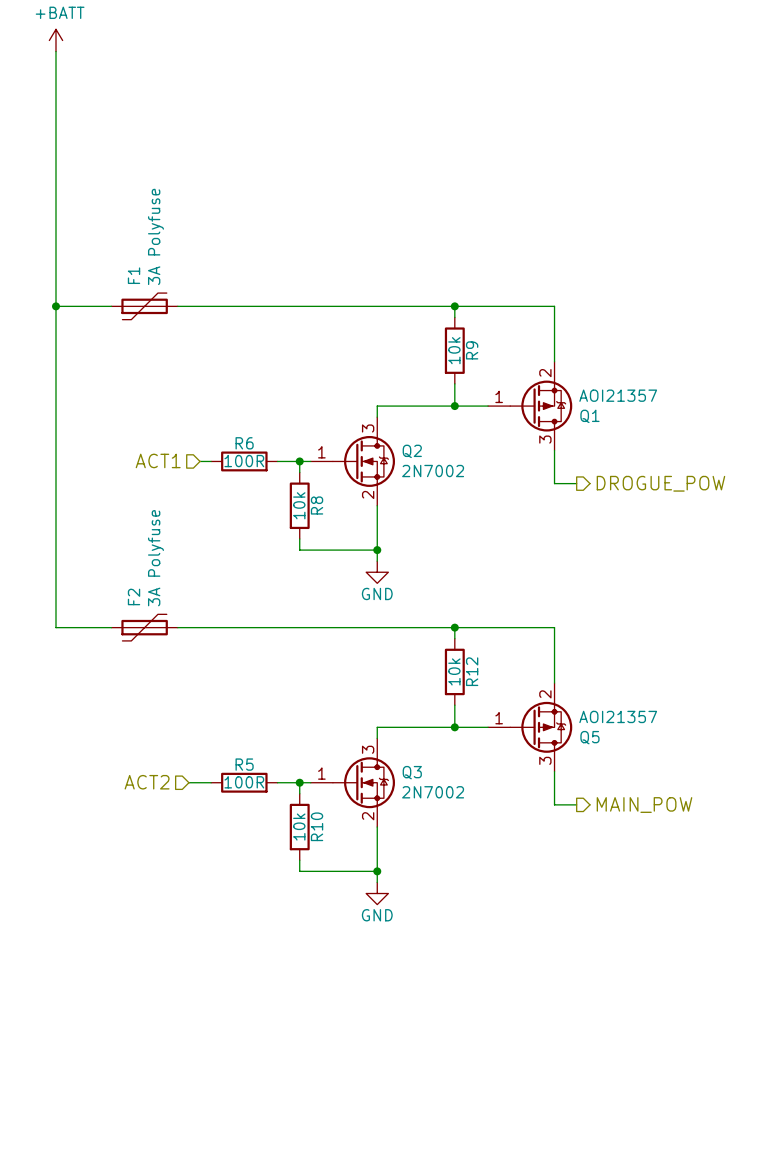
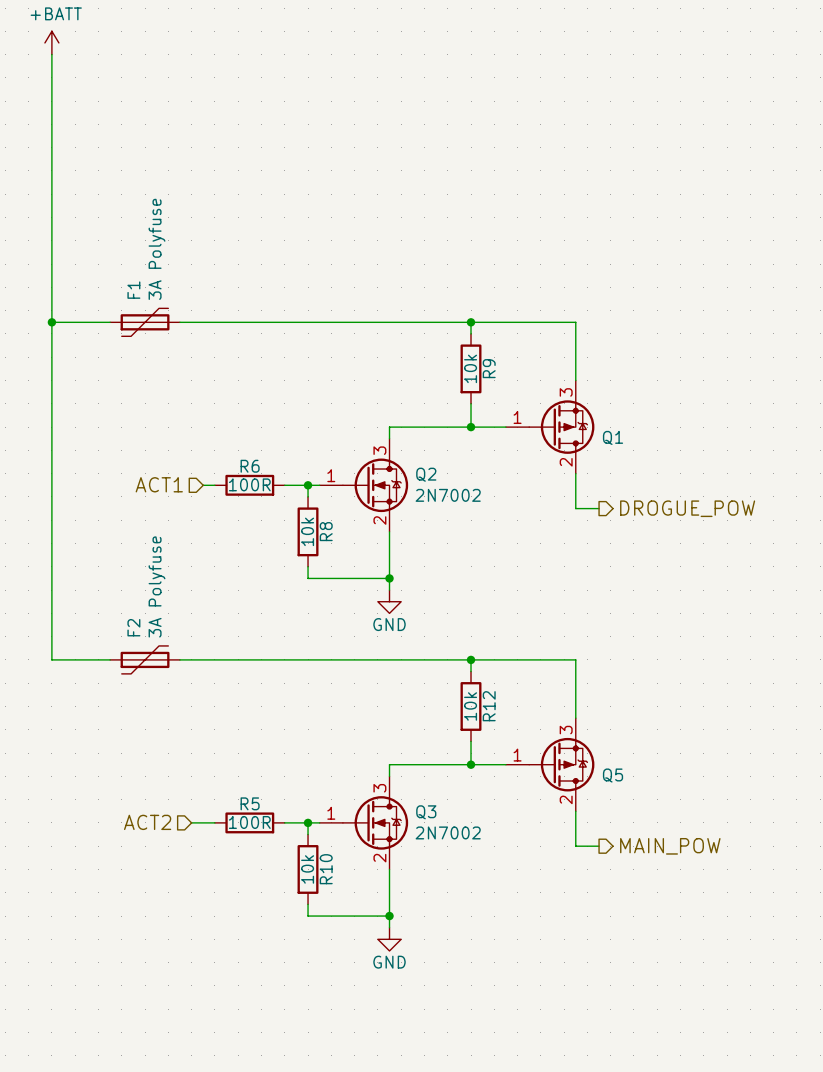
Q1 pin number: 2 (545, 373) -> 3 (566, 392)
Q1 value: AOI21357 (618, 395) -> none
Q1 pin number: 3 (545, 439) -> 2 (566, 462)
Q5 pin number: 2 (545, 694) -> 3 (566, 730)
Q5 value: AOI21357 (618, 716) -> none
Q5 pin number: 3 (545, 760) -> 2 (566, 799)

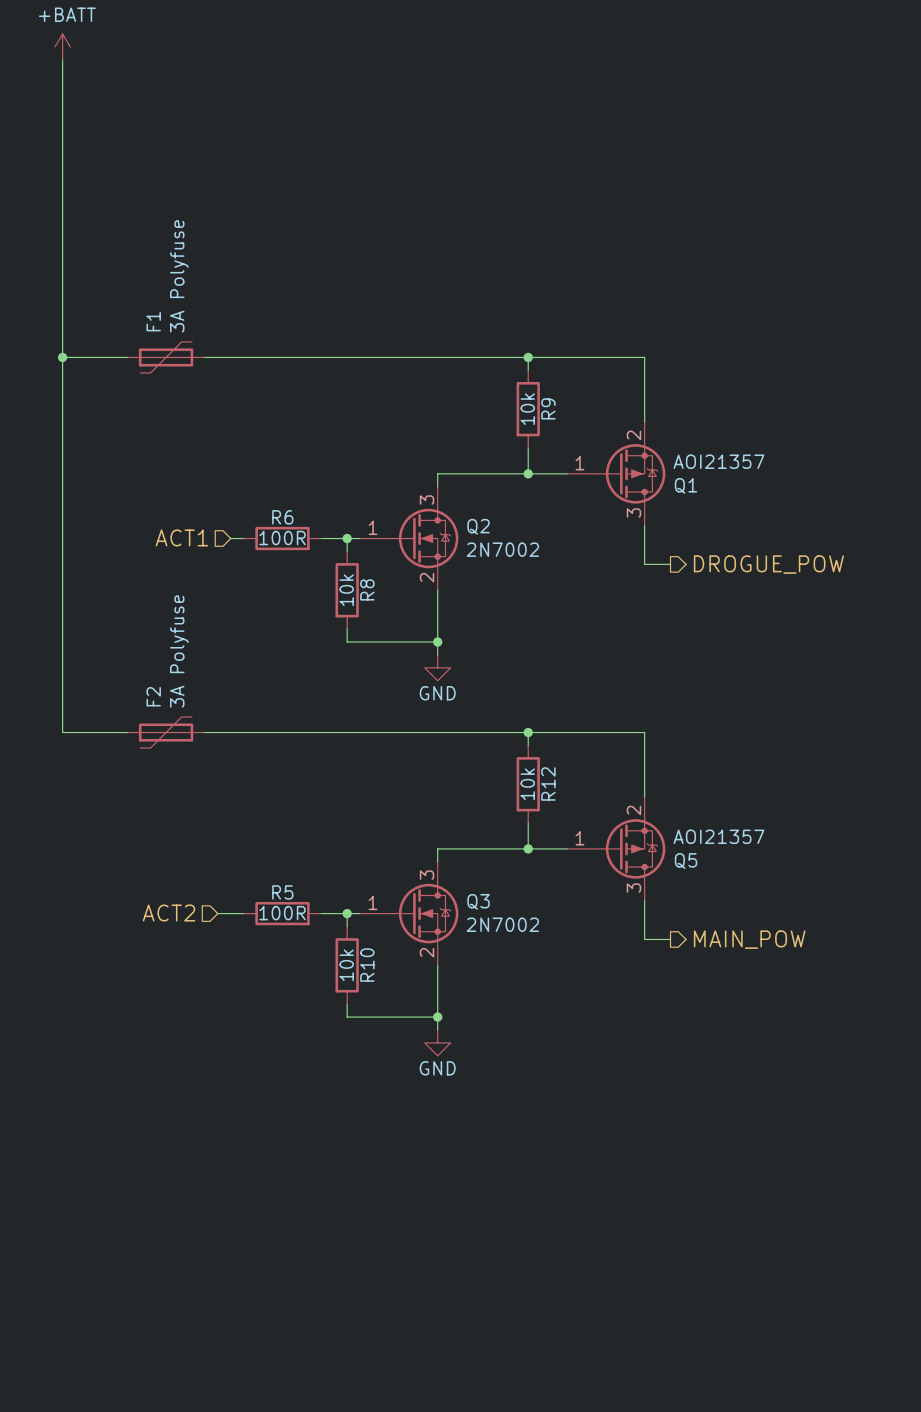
Q1 pin number: 3 (566, 392) -> 2 (633, 435)
Q1 value: none -> AOI21357 (718, 461)
Q1 pin number: 2 (566, 462) -> 3 (633, 512)
Q5 pin number: 3 (566, 730) -> 2 (633, 810)
Q5 value: none -> AOI21357 (718, 836)
Q5 pin number: 2 (566, 799) -> 3 (633, 888)

